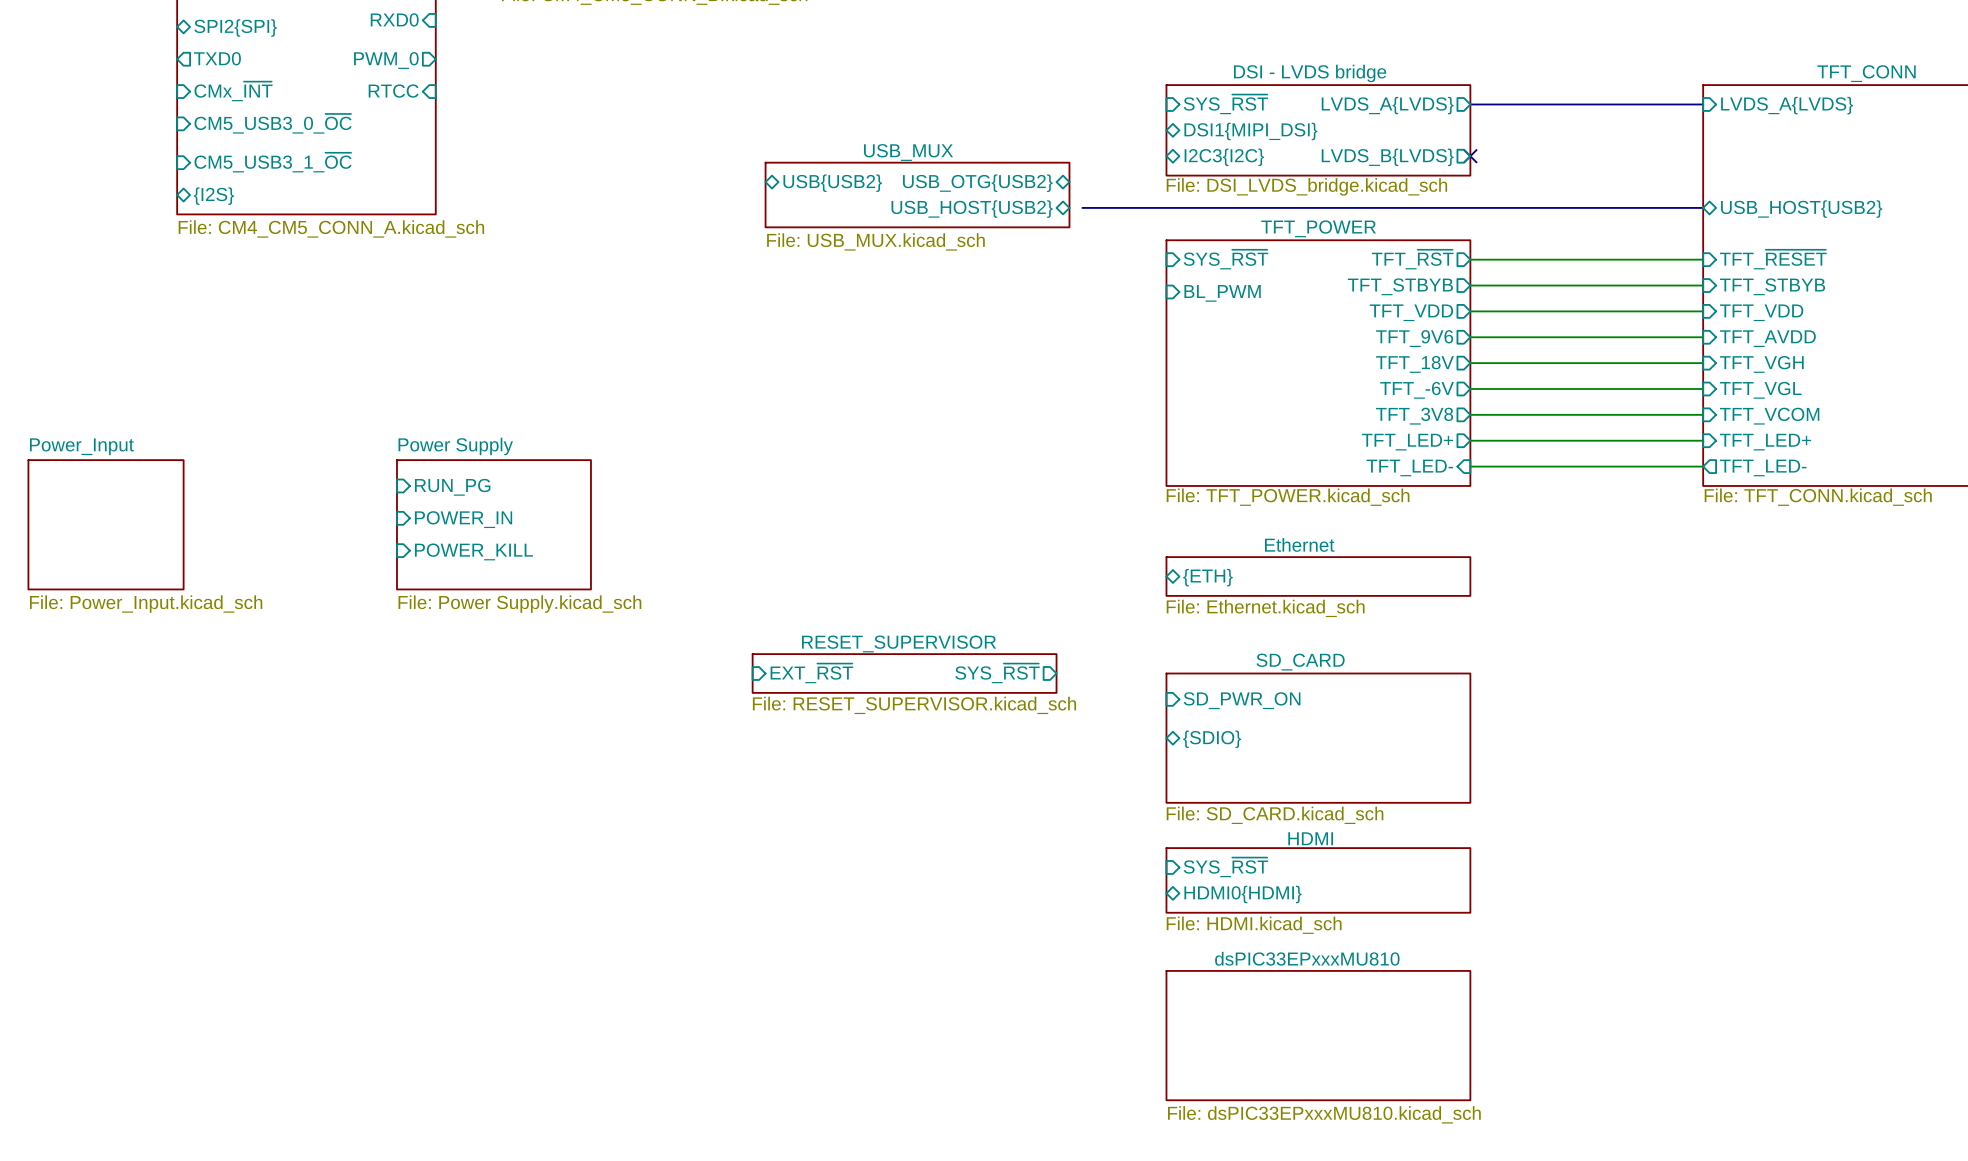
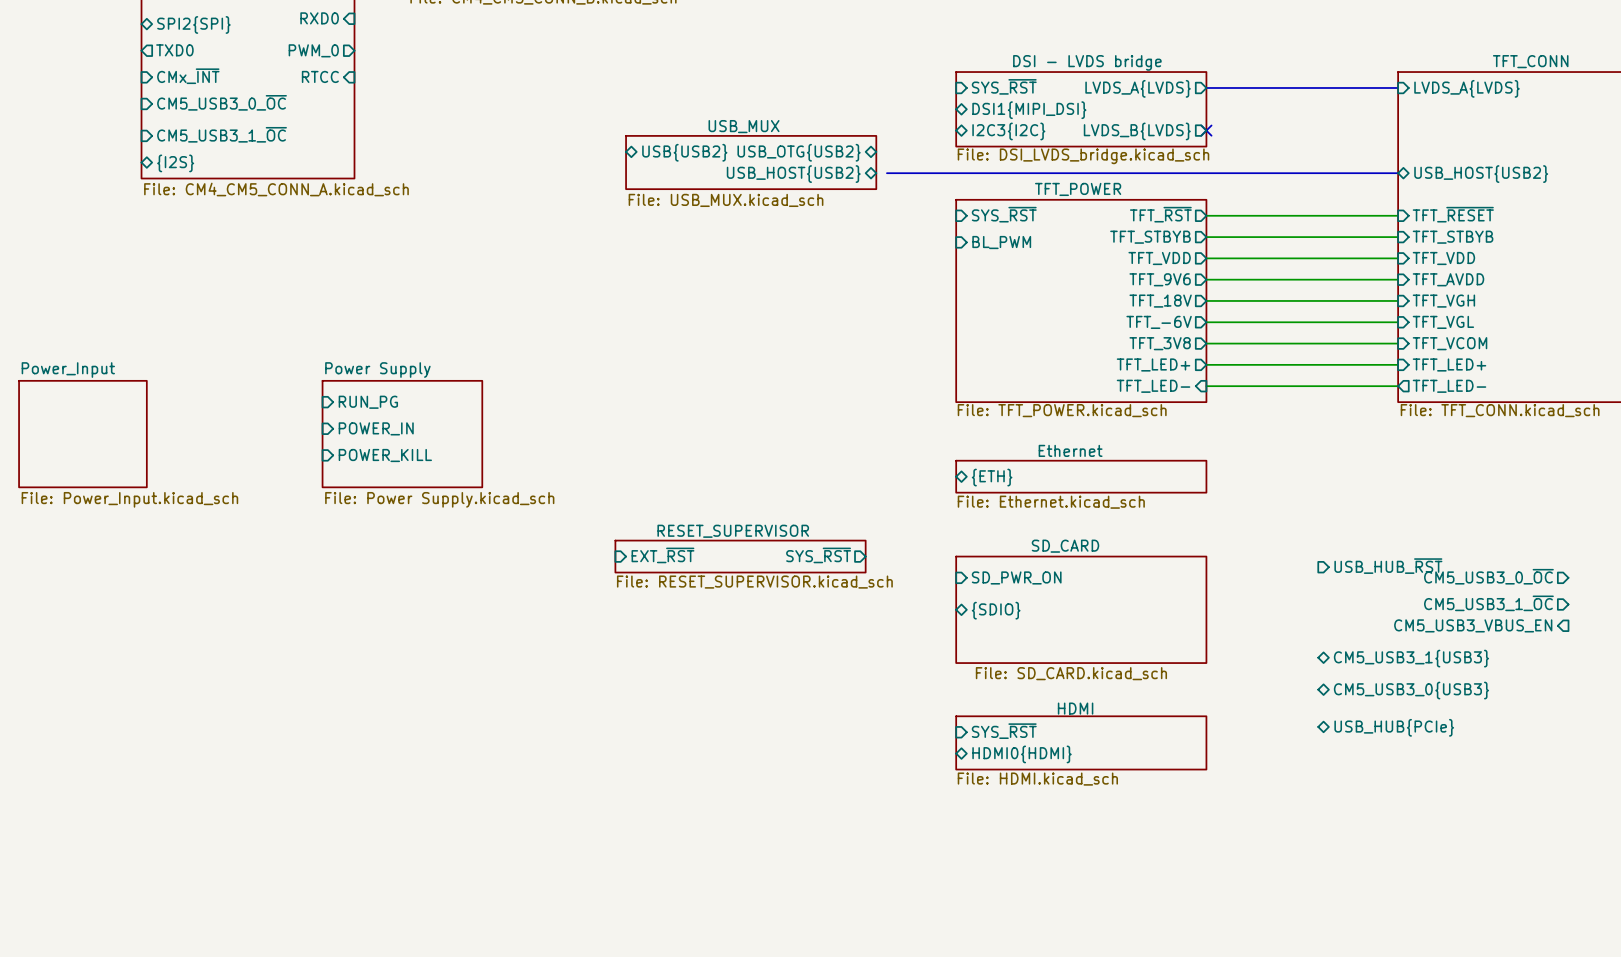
sheet pin: none -> USB_HUB_~{RST} (1388, 566)
sheet pin: none -> CM5_USB3_0_~{OC} (1488, 576)
sheet pin: none -> CM5_USB3_1_~{OC} (1488, 603)
sheet pin: none -> CM5_USB3_VBUS_EN (1473, 625)
sheet pin: none -> CM5_USB3_1{USB3} (1411, 658)
sheet SD_CARD value position: File: SD_CARD.kicad_sch (1275, 815) -> File: SD_CARD.kicad_sch (1071, 673)
sheet pin: none -> CM5_USB3_0{USB3} (1411, 690)
sheet pin position: SYS_~{RST} (1225, 867) -> SYS_~{RST} (1004, 731)
sheet HDMI position: (1318, 880) -> (1081, 742)
sheet pin: none -> USB_HUB{PCIe} (1394, 727)
sheet pin position: HDMI0{HDMI} (1243, 894) -> HDMI0{HDMI} (1022, 754)
sheet dsPIC33EPxxxMU810: File: dsPIC33EPxxxMU810.kicad_sch (1318, 1035) -> none

